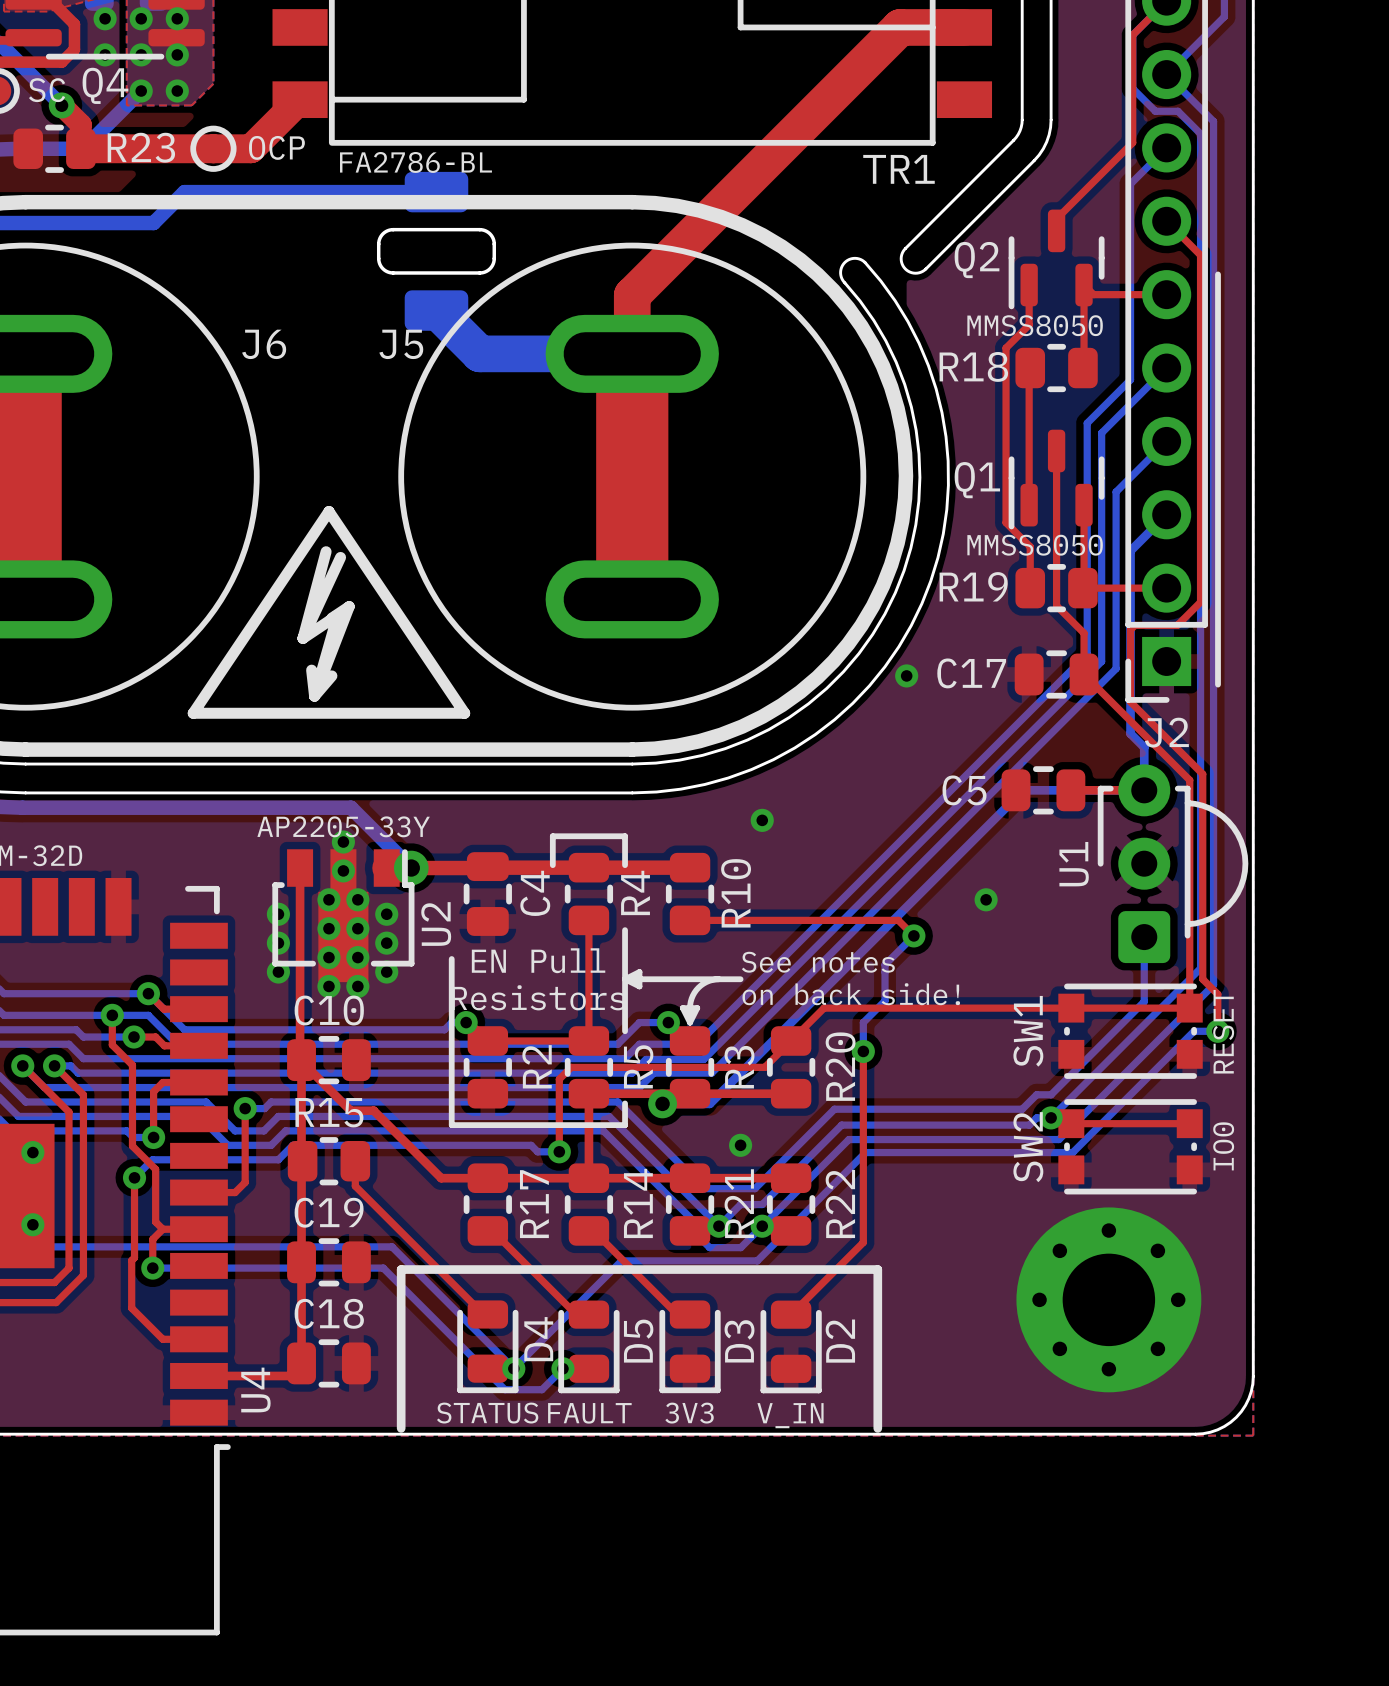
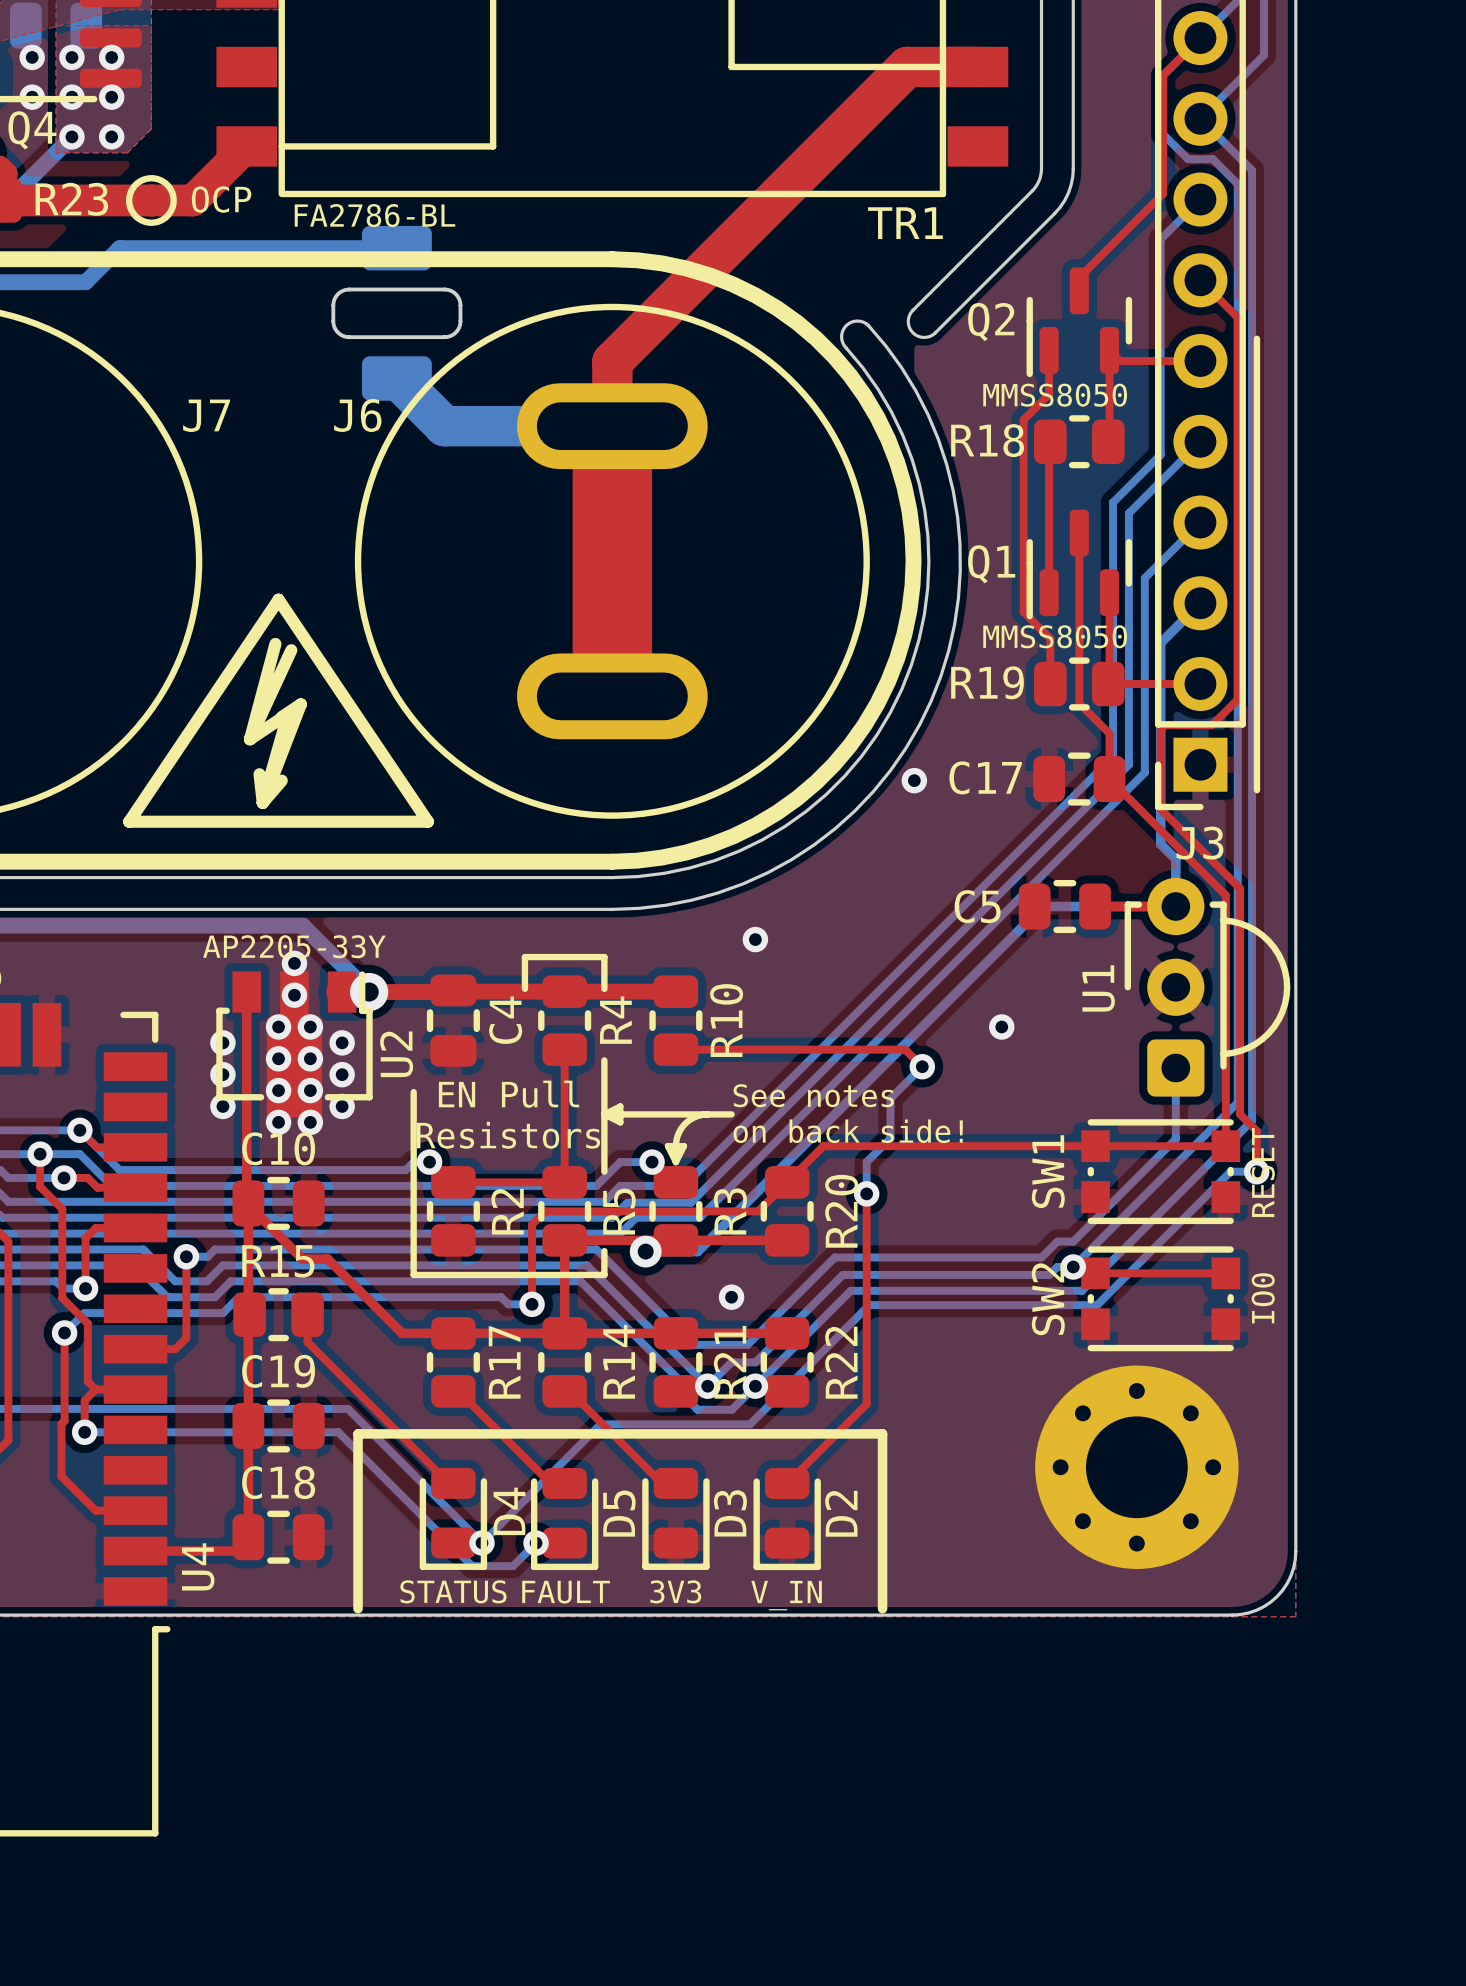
J6 name: J6 (264, 344) -> J7 (206, 415)
J5 name: J5 (401, 344) -> J6 (357, 415)
J2 name: J2 (1166, 732) -> J3 (1199, 843)

